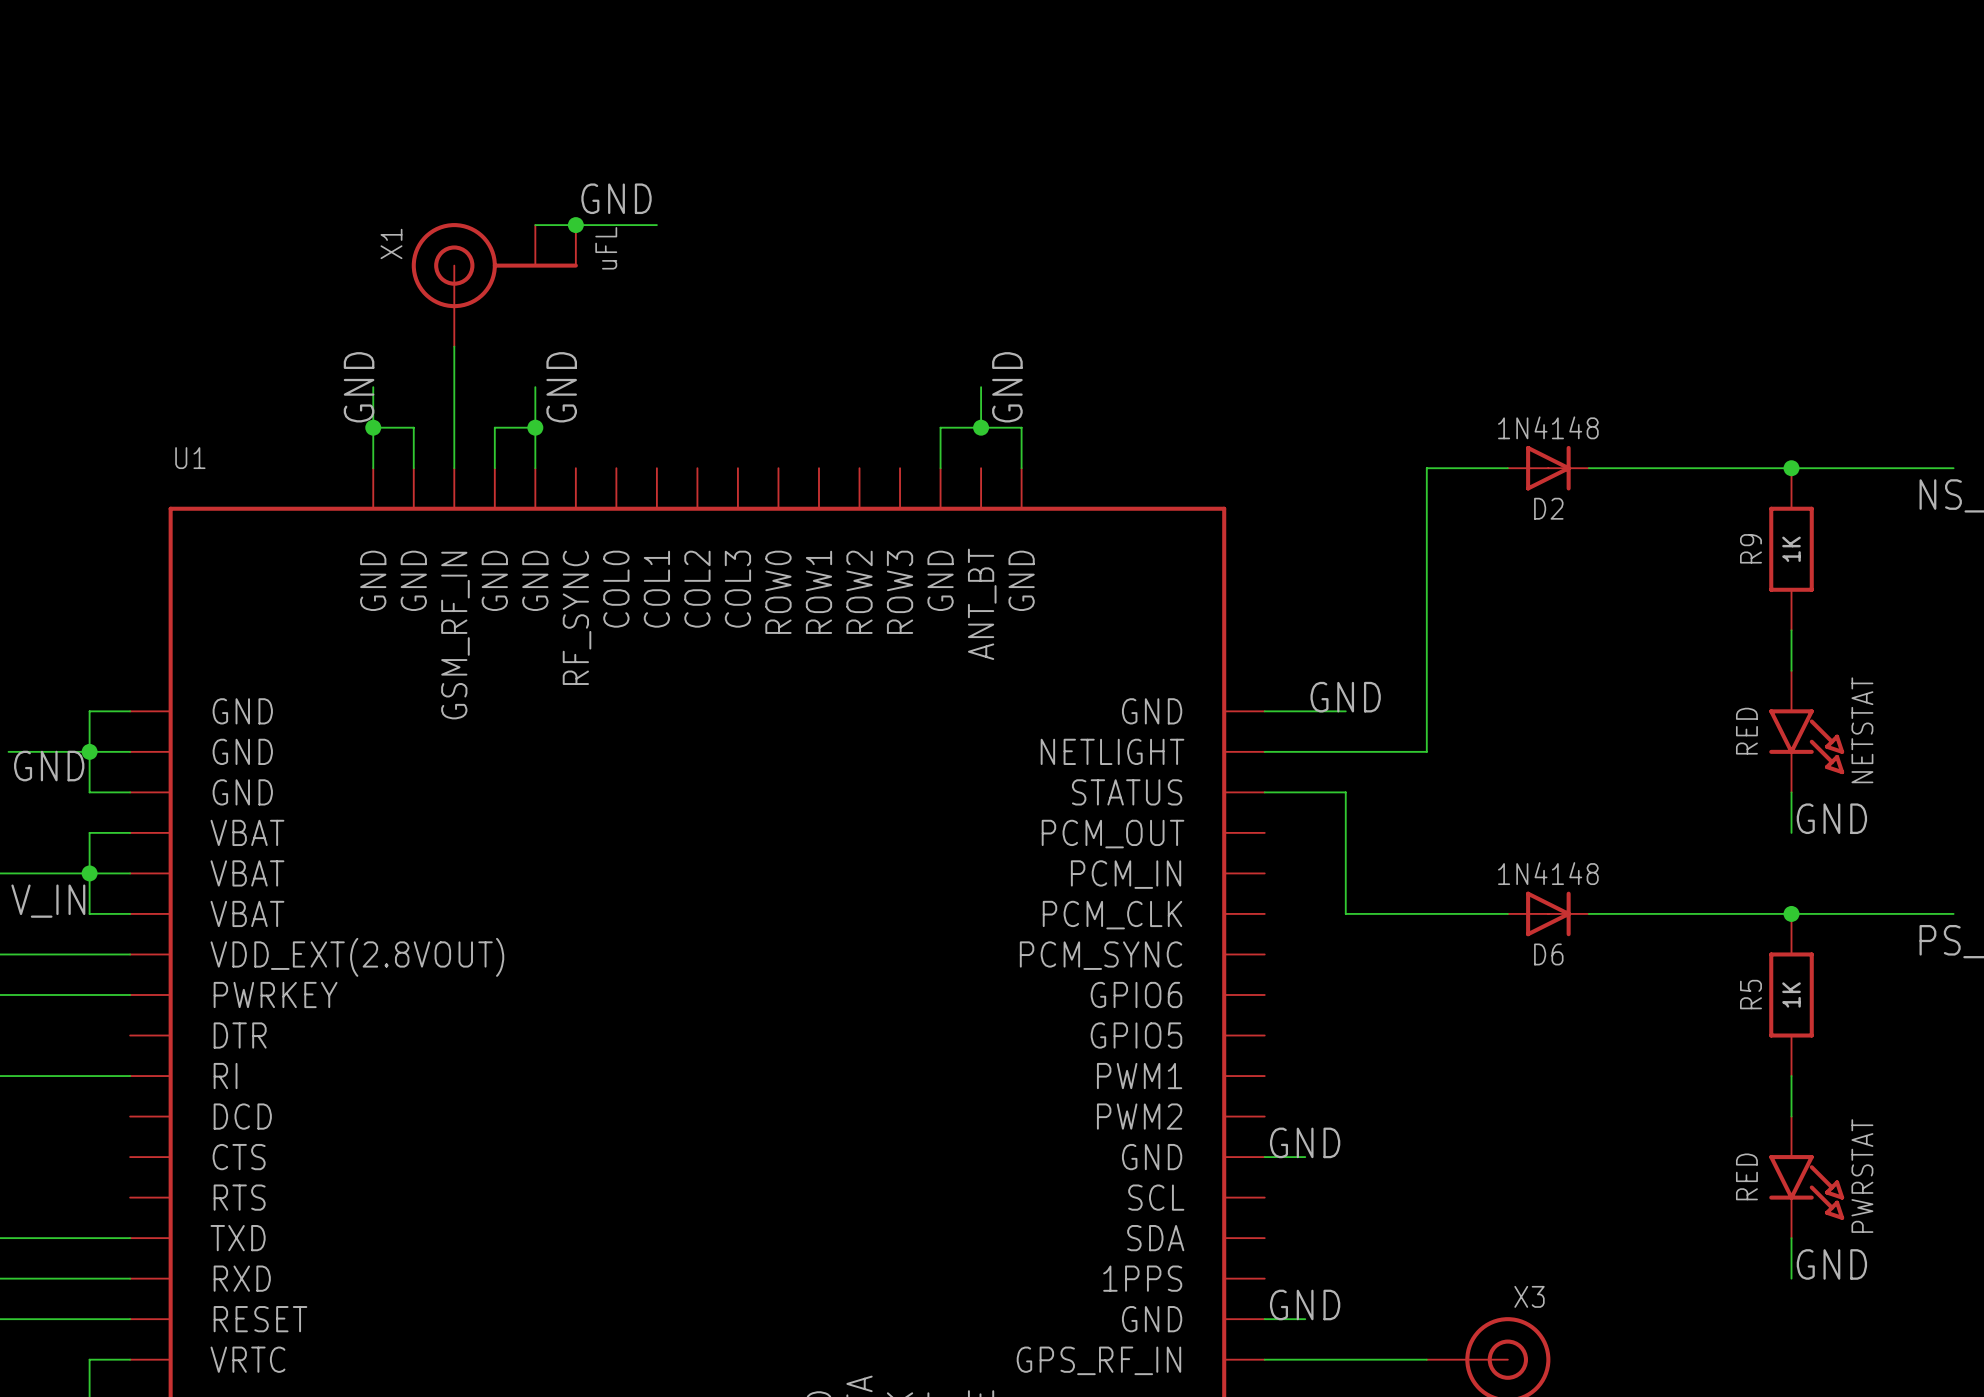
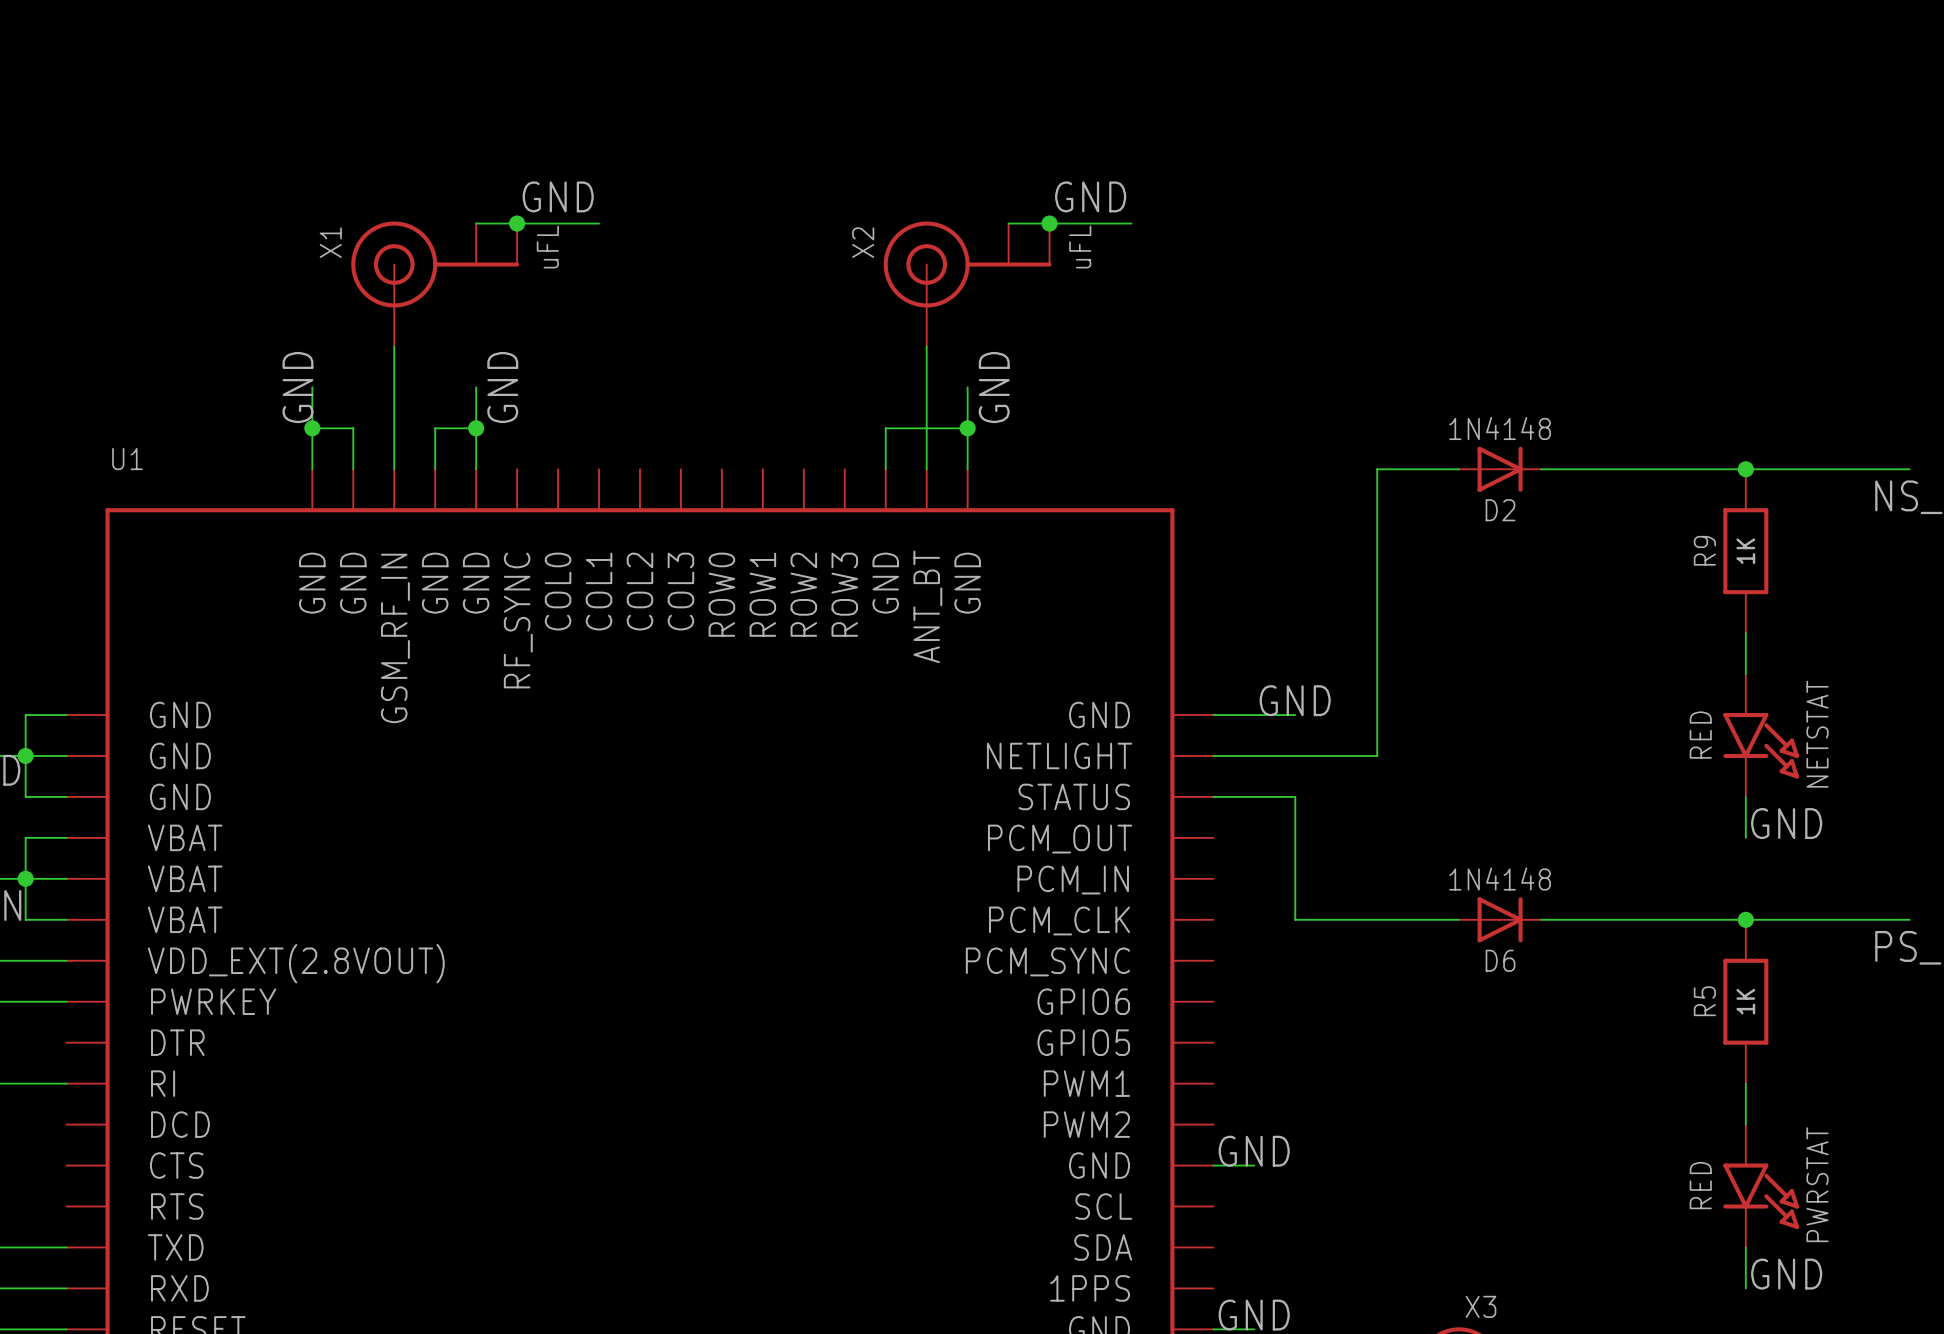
label: none -> GND (1090, 196)
wire: none -> (1008, 223) (1131, 223)
junction: none -> (1049, 223)
X2: none -> uFL (967, 283)
wire: none -> (926, 346) (926, 387)
label position: GND (1007, 387) -> GND (994, 387)
wire: none -> (967, 387) (967, 428)
wire: none -> (926, 428) (926, 469)
junction position: (981, 427) -> (967, 428)

